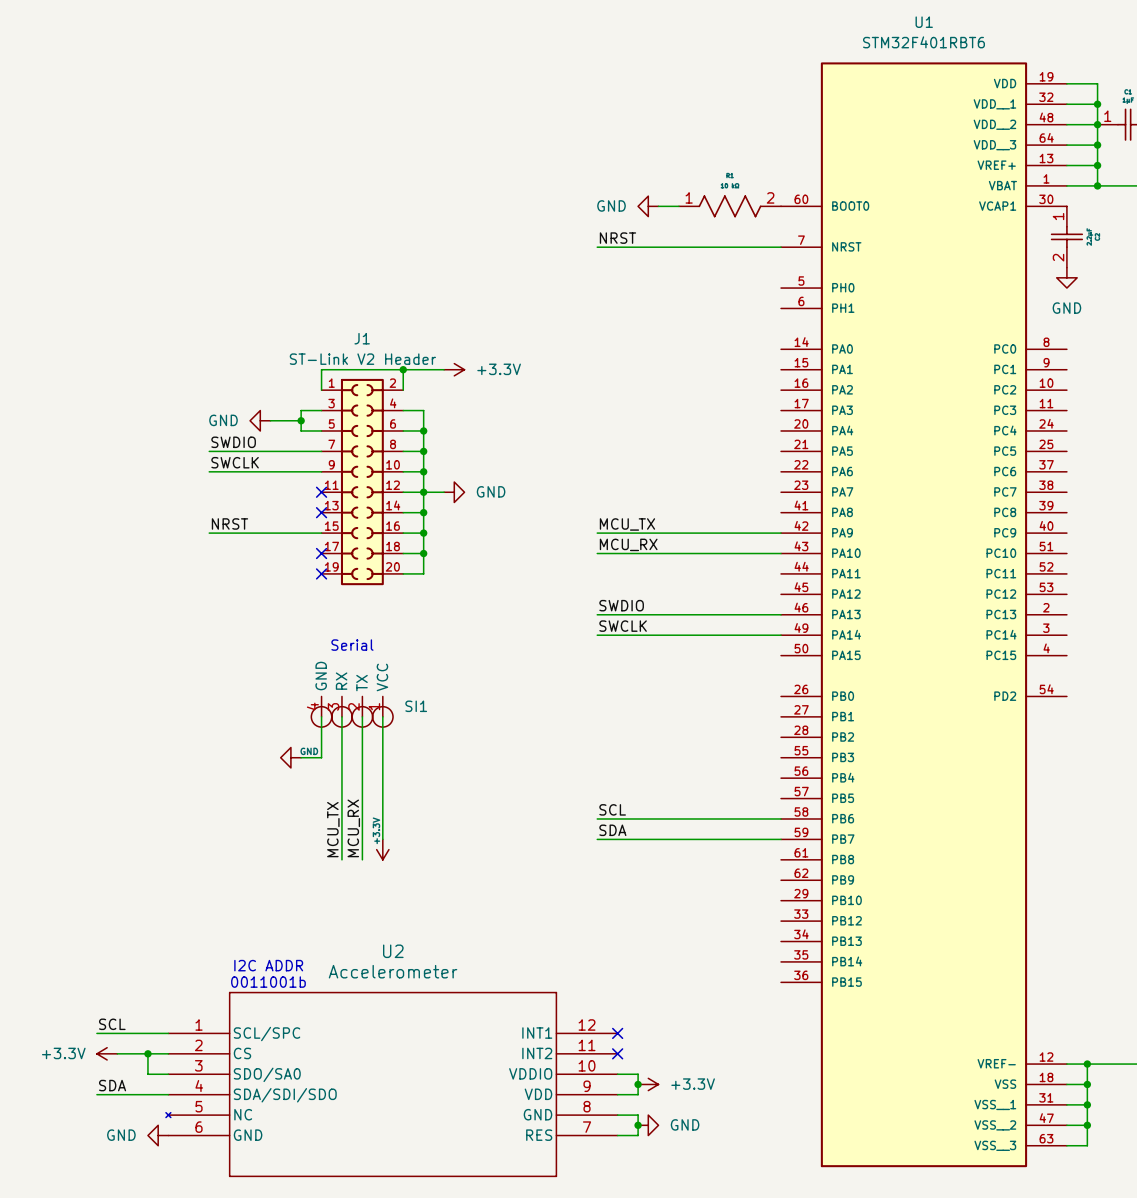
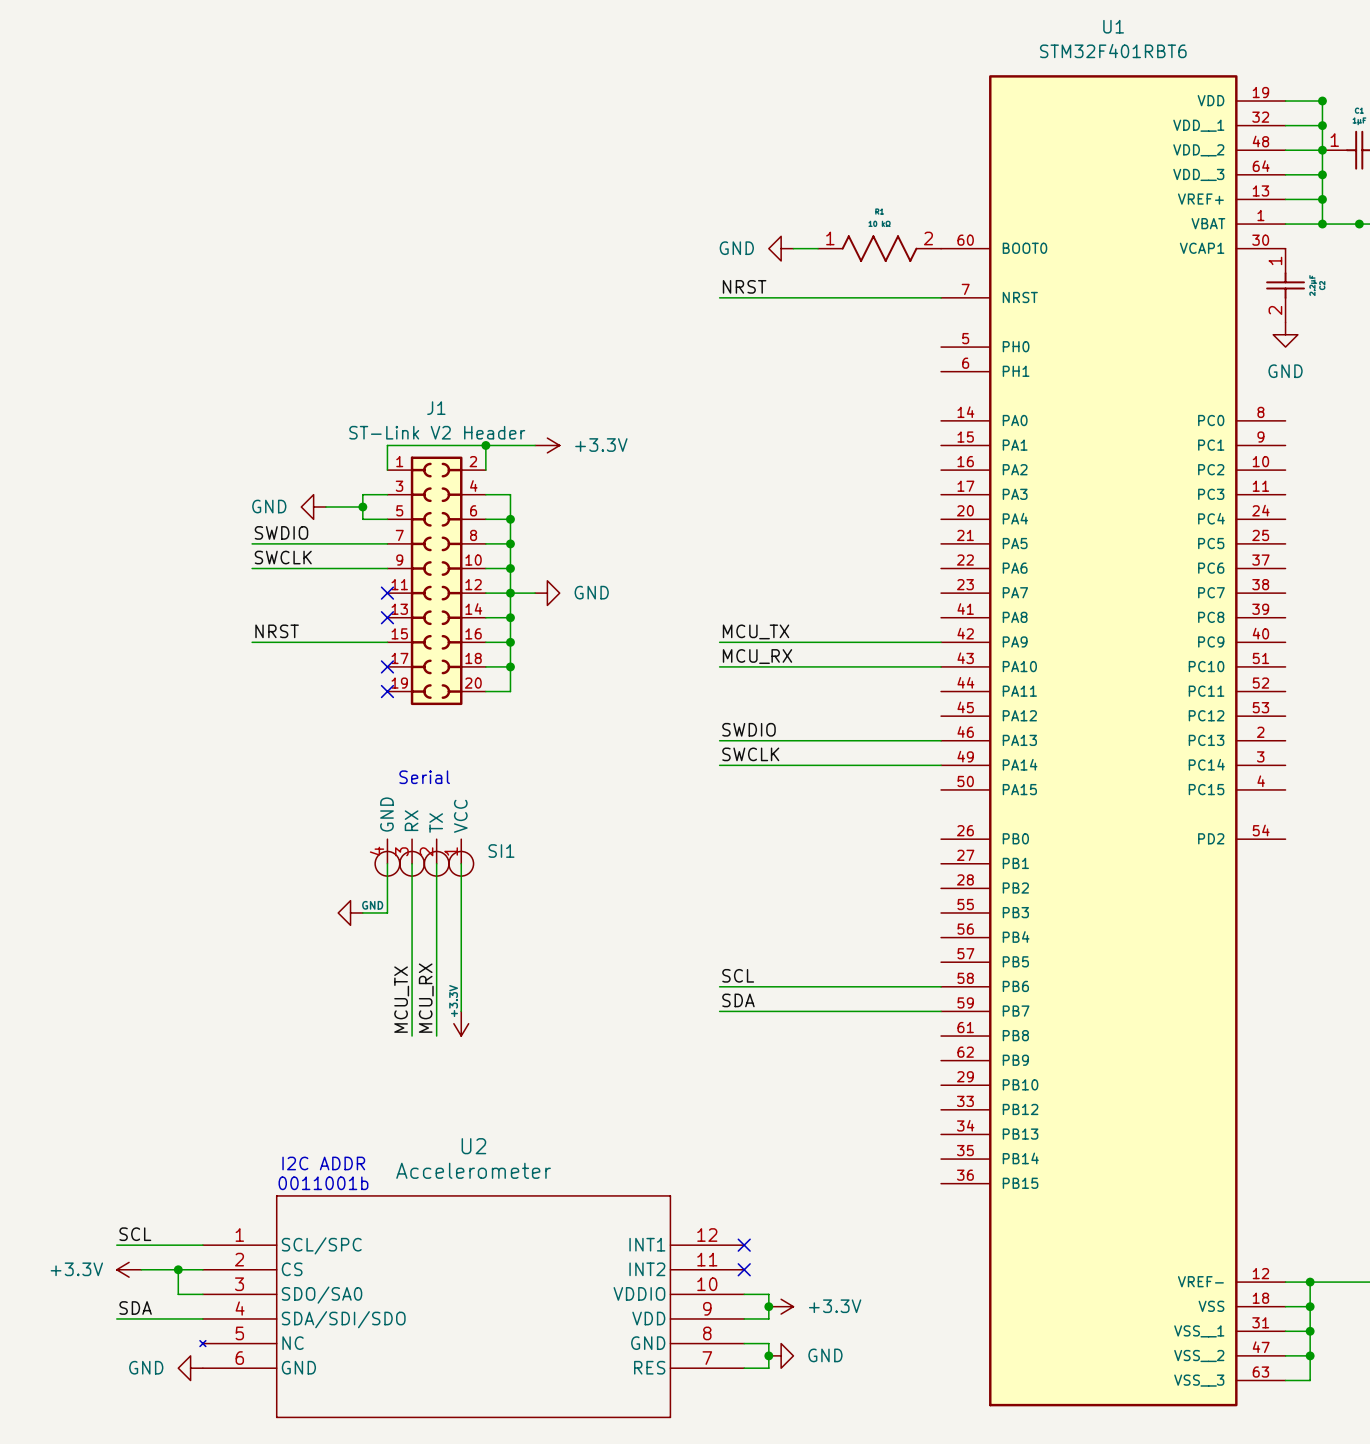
junction: none -> (1322, 101)
junction: none -> (1359, 224)

